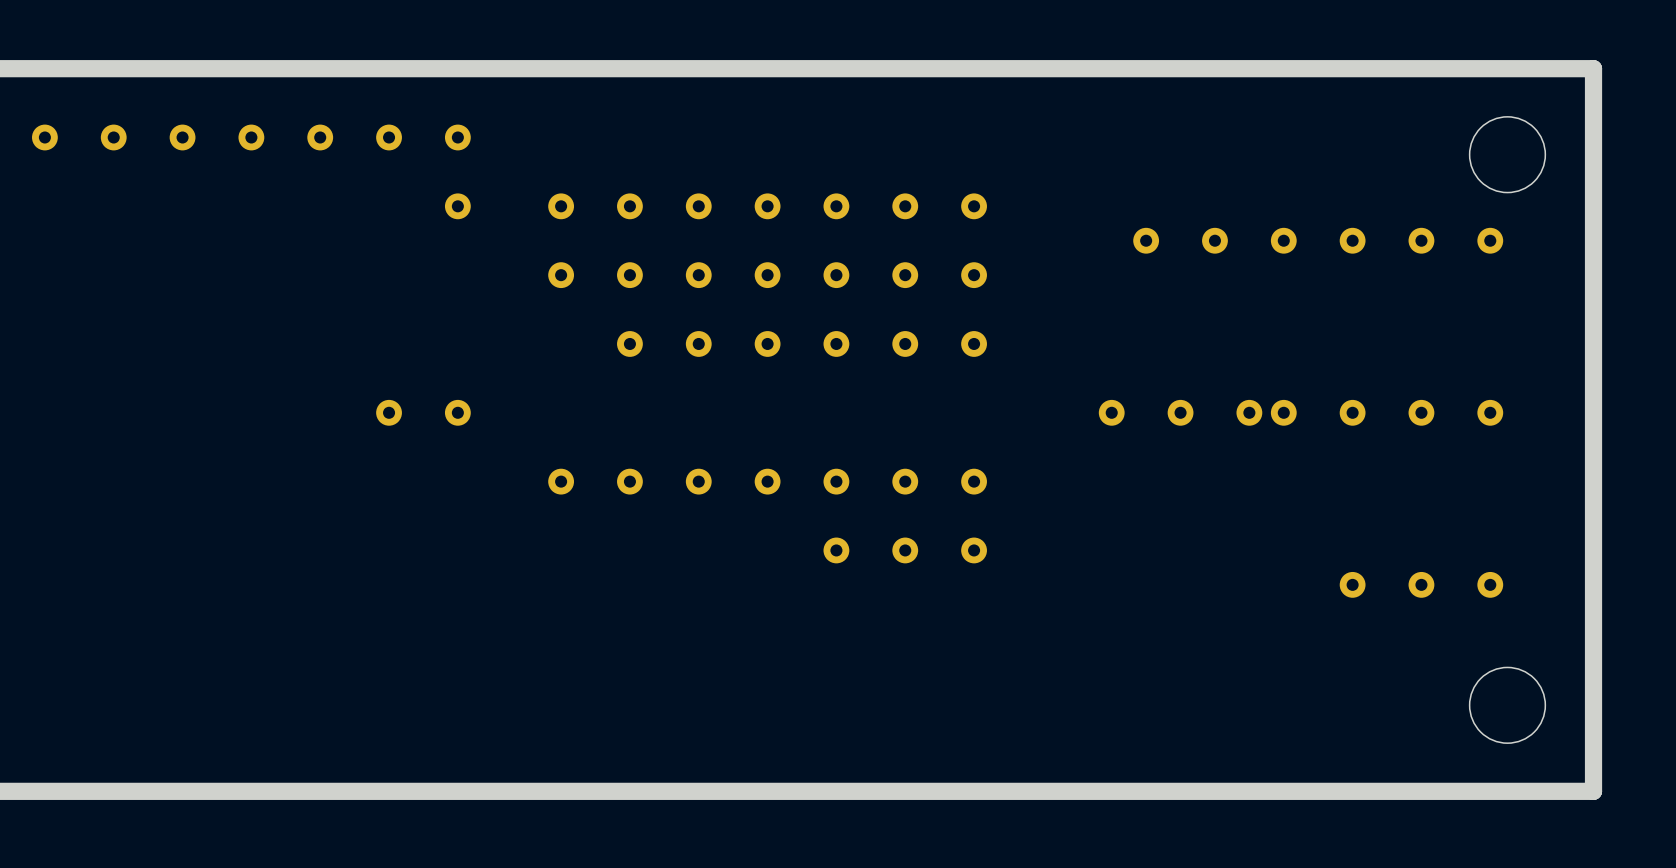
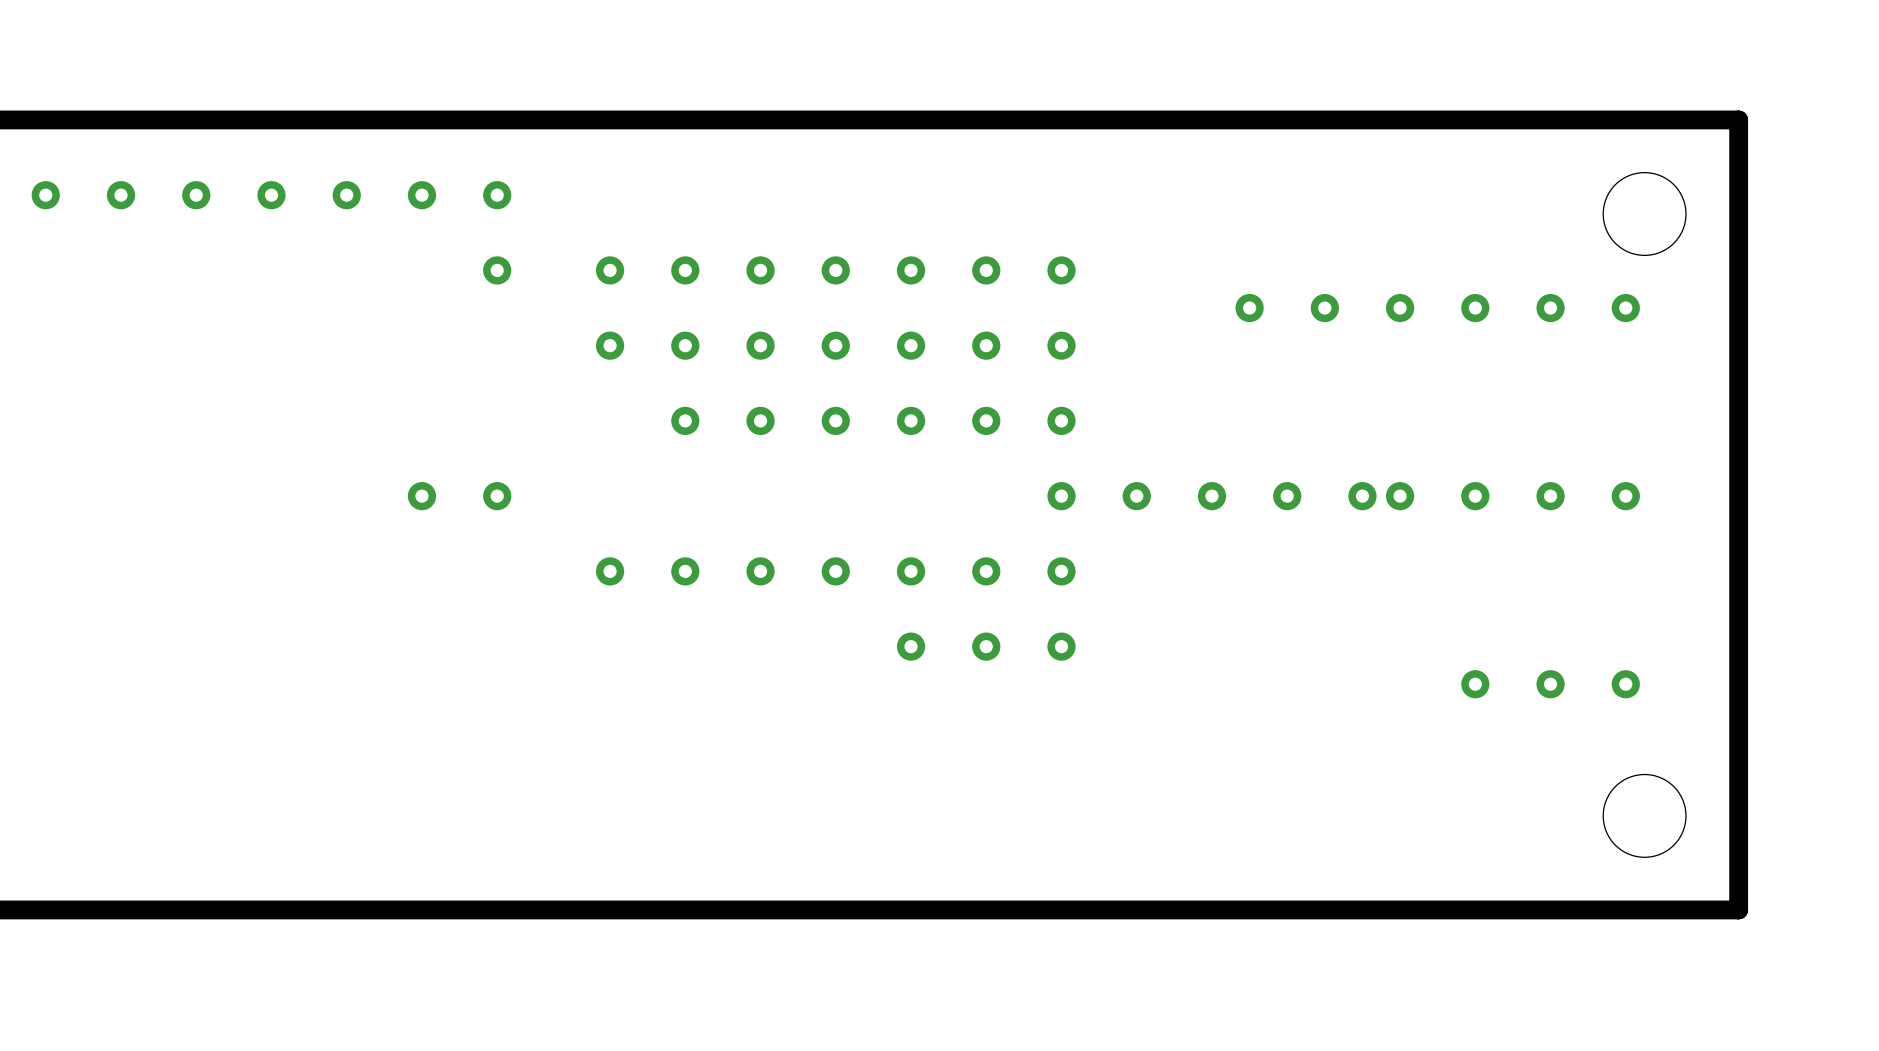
part: none -> (1211, 496)

